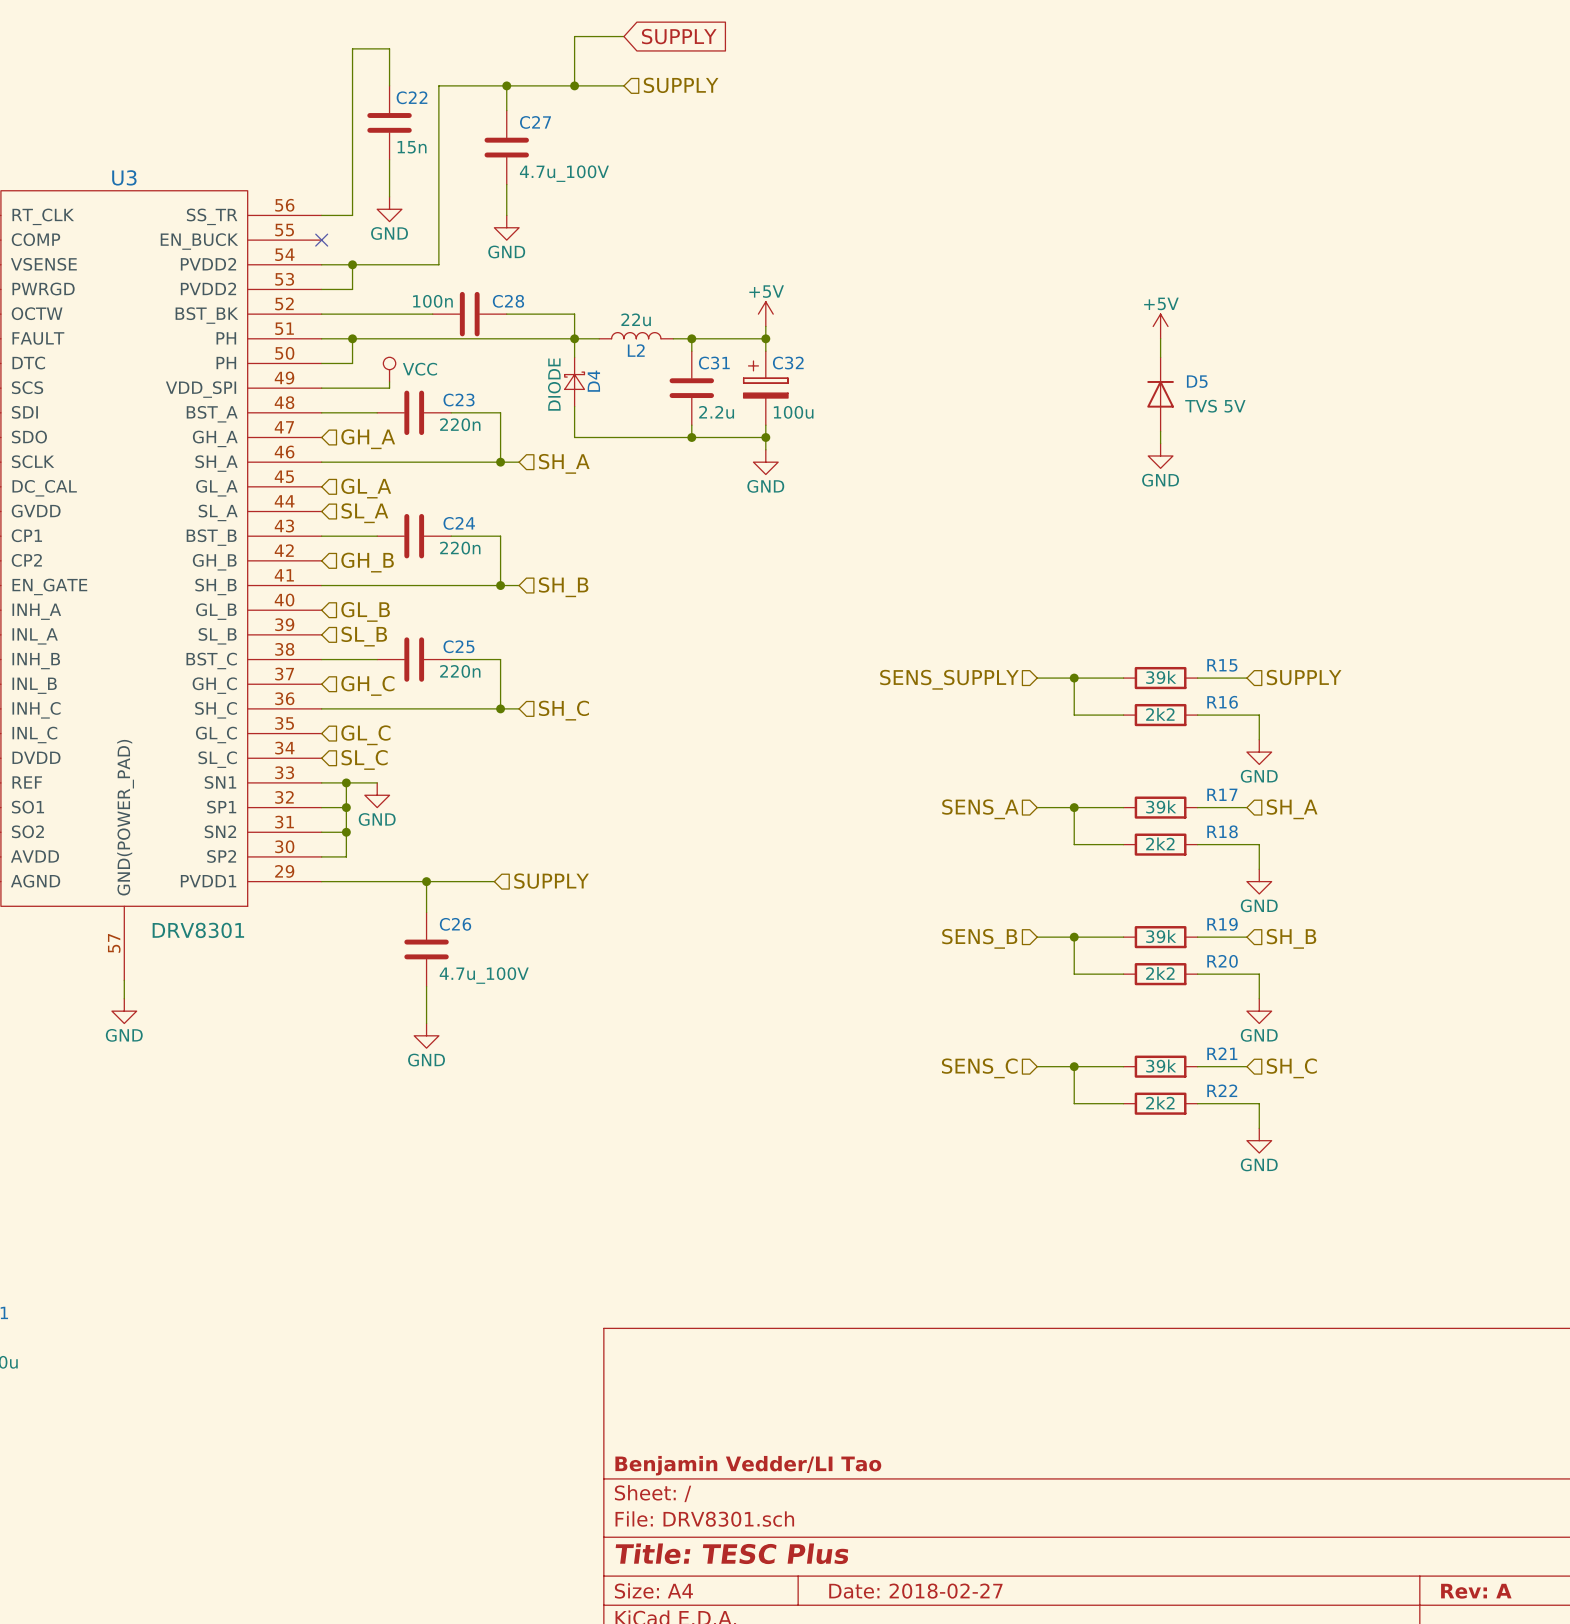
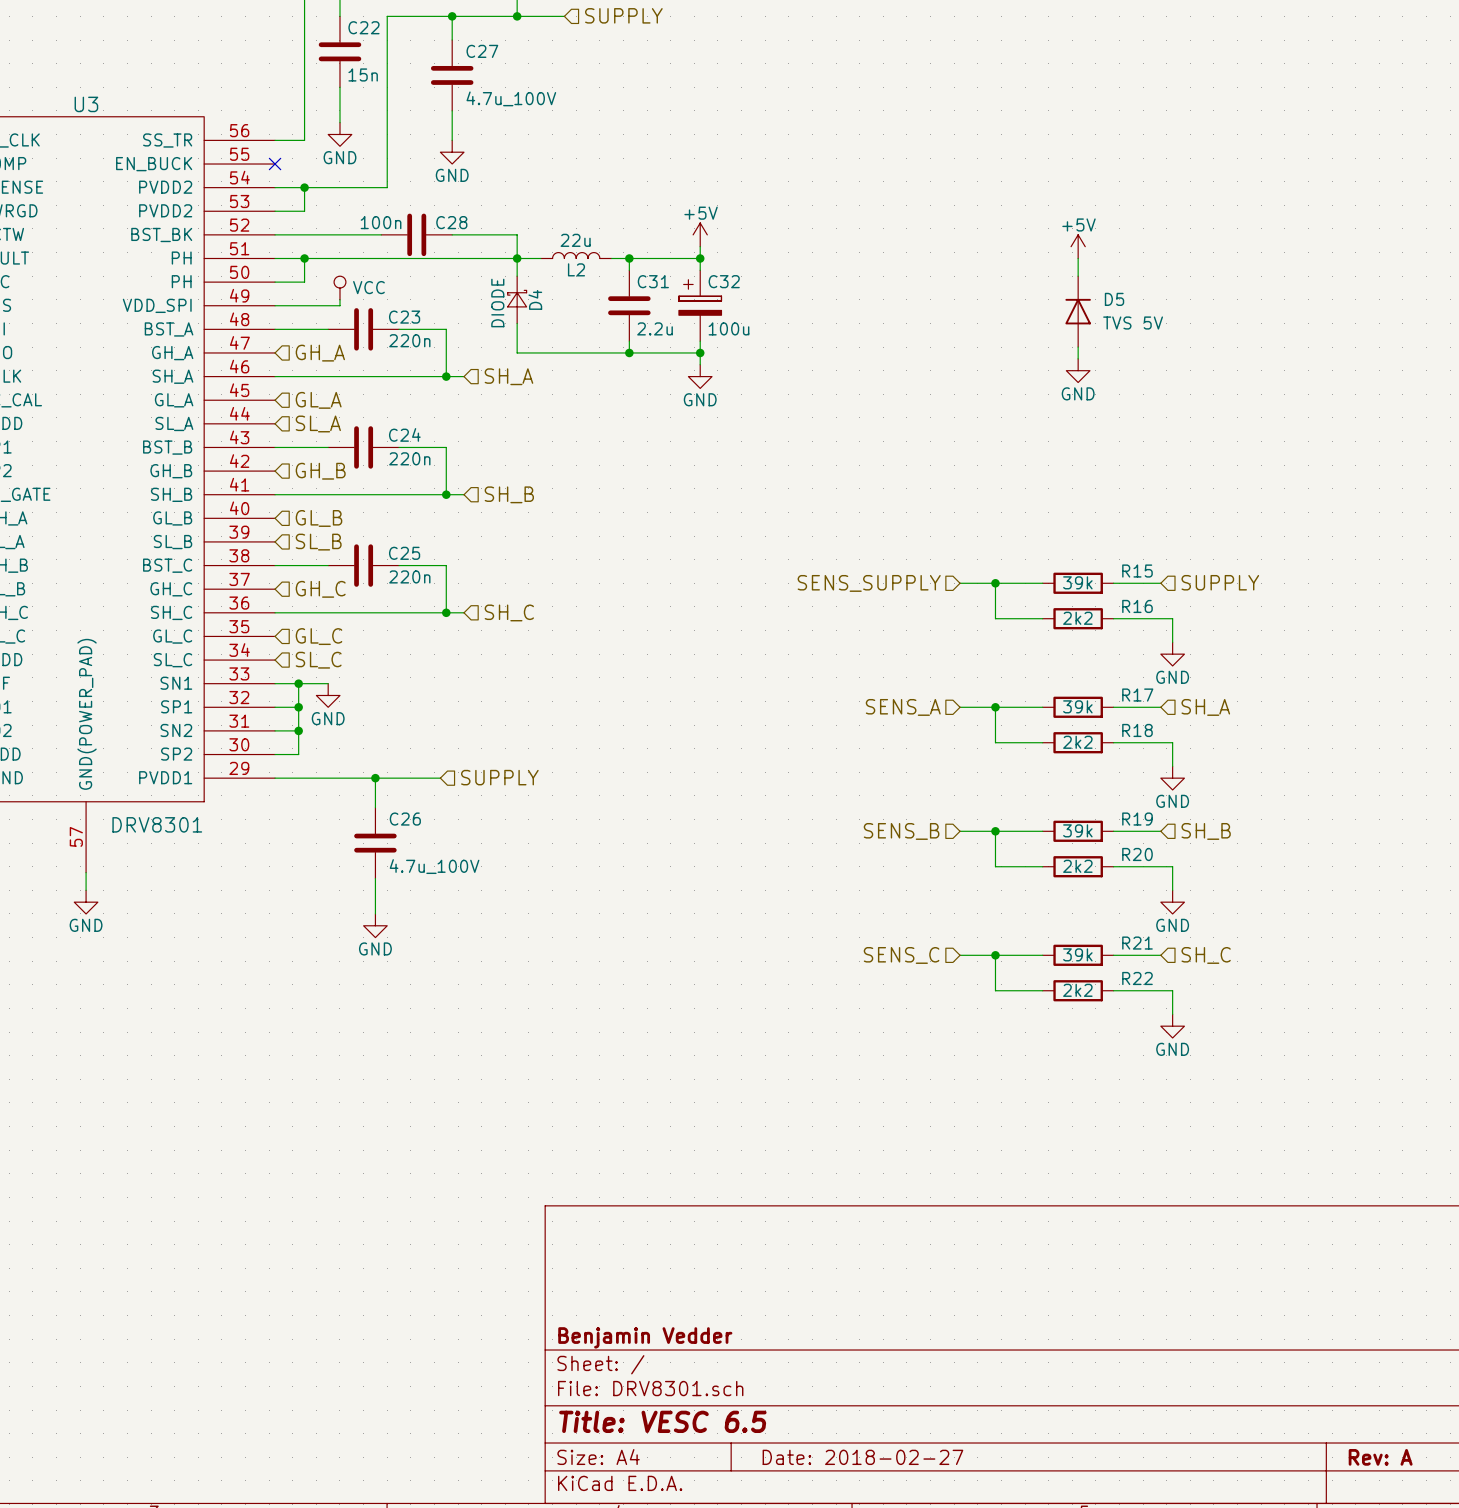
title block: Benjamin Vedder/LI Tao (748, 1465) -> Benjamin Vedder (645, 1337)
title block: Title: TESC Plus (731, 1553) -> Title: VESC 6.5 (662, 1421)

